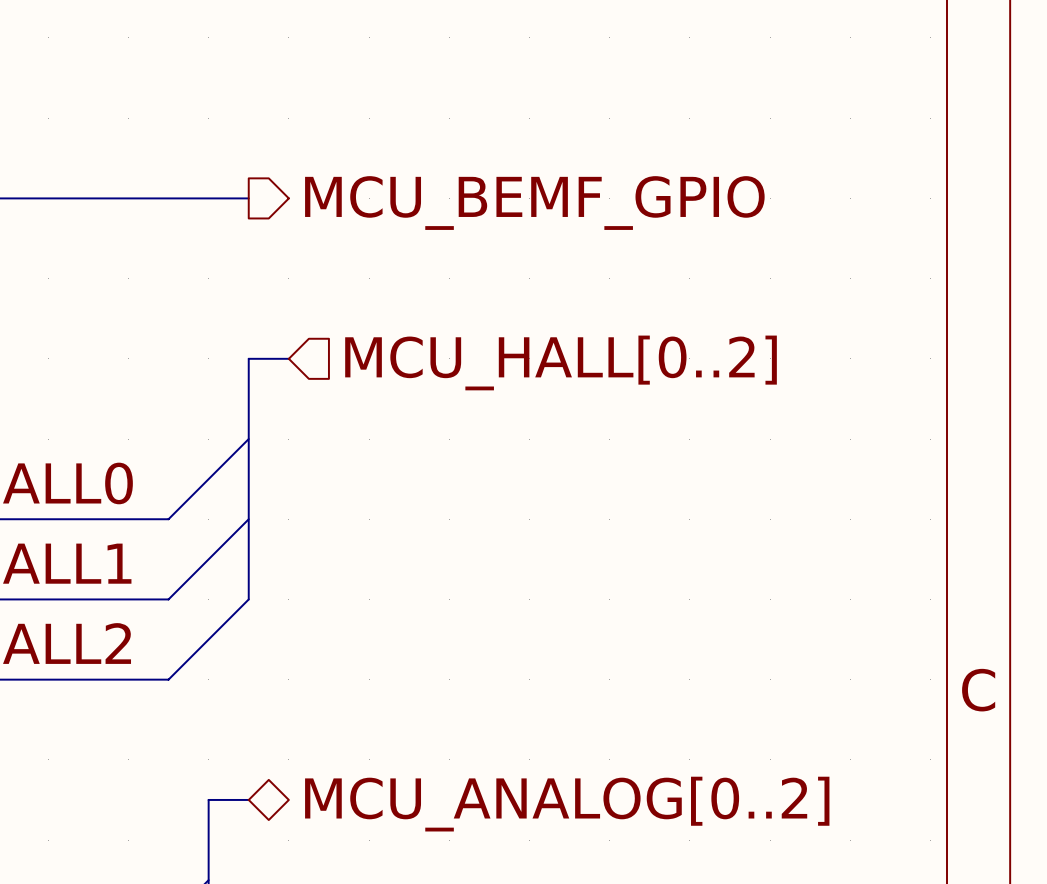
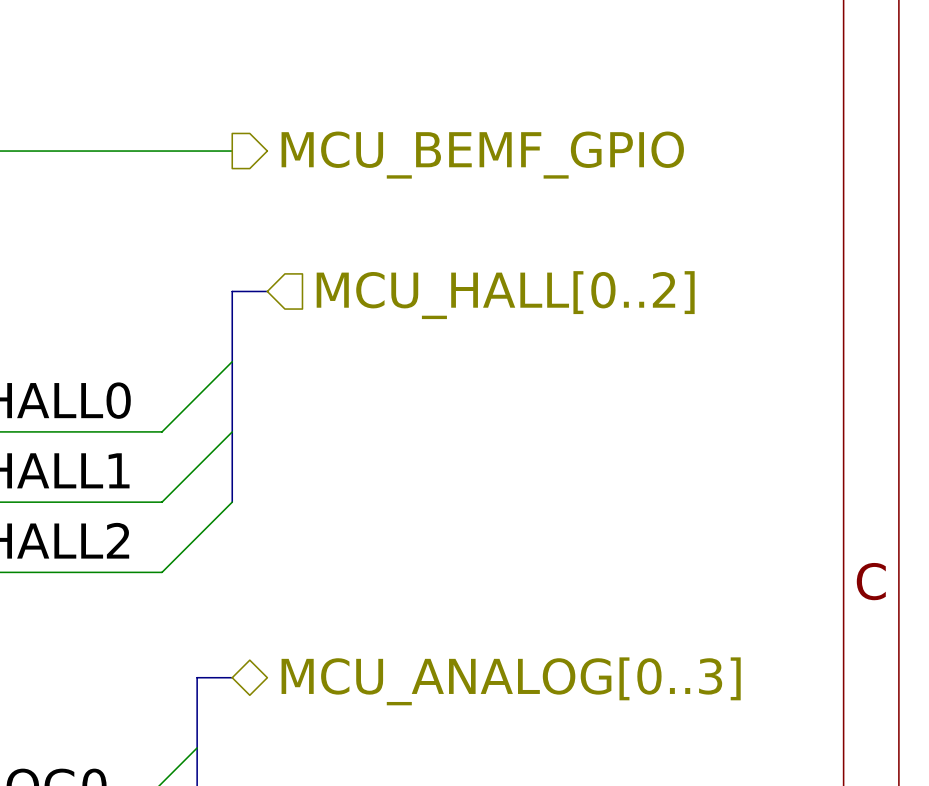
hierarchical label: MCU_ANALOG[0..2] (567, 804) -> MCU_ANALOG[0..3] (511, 681)

